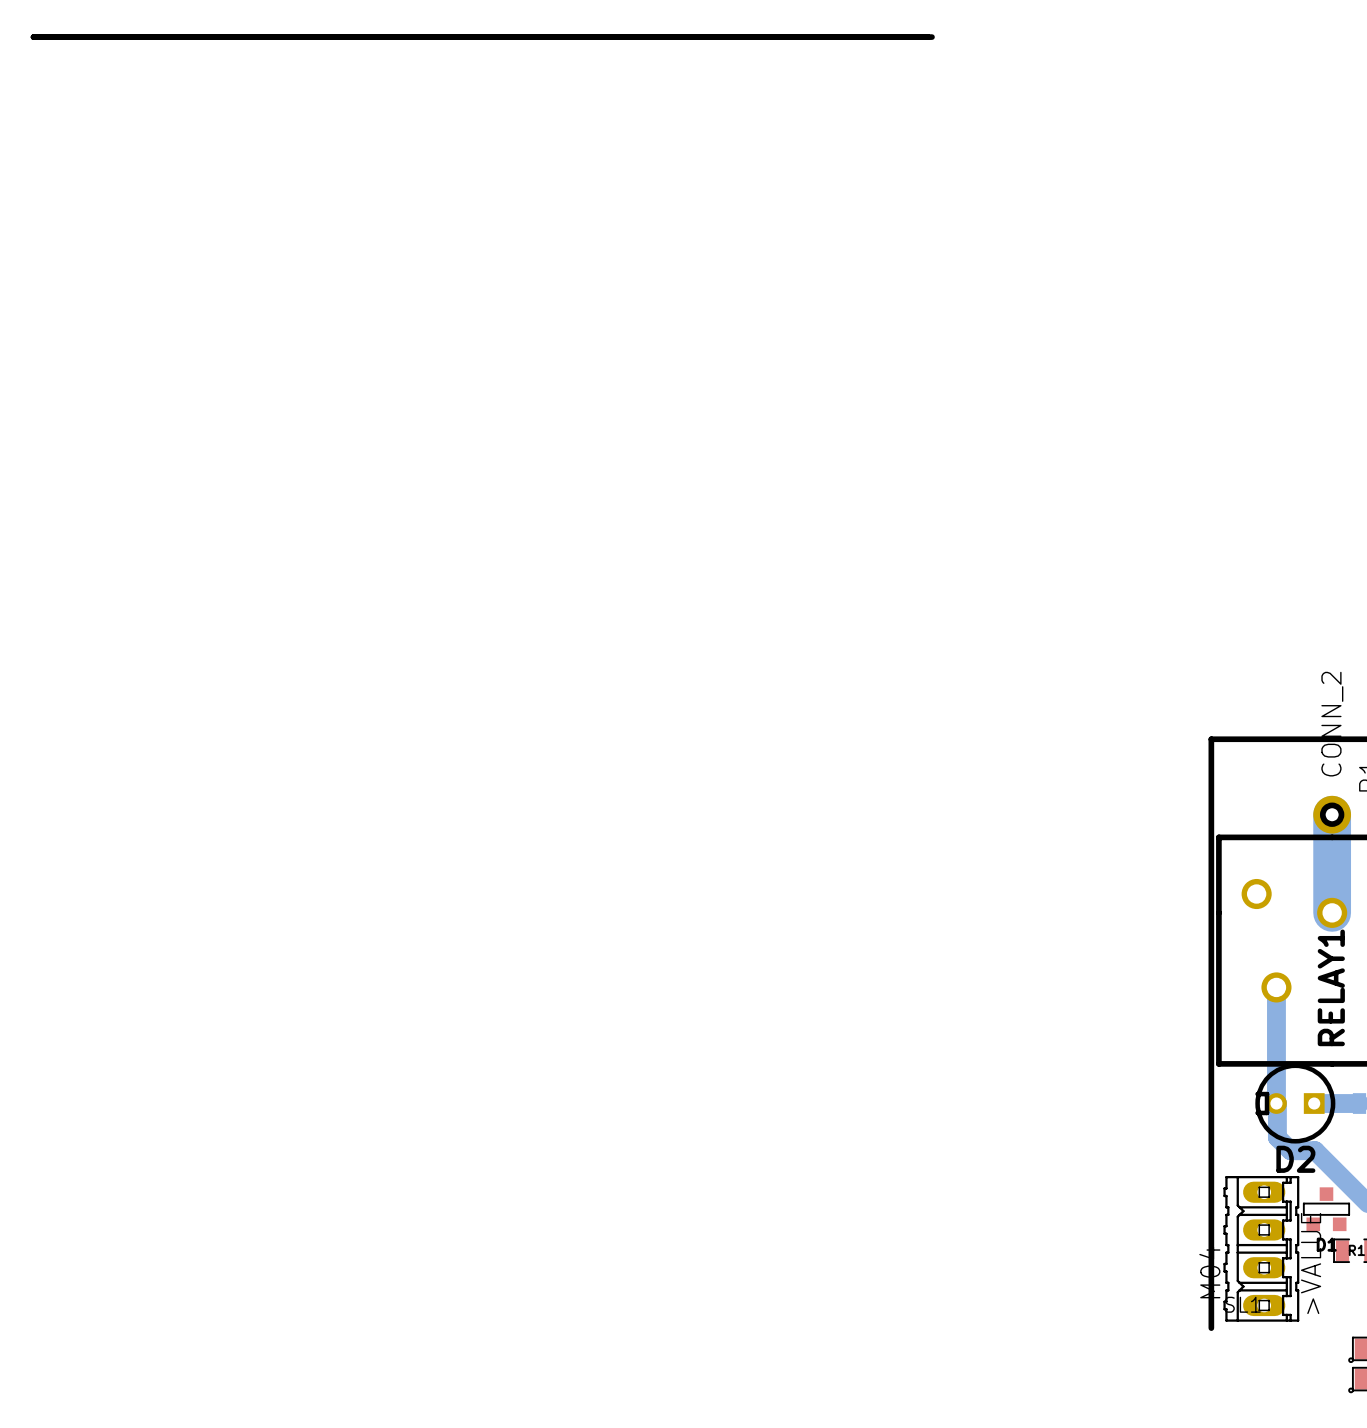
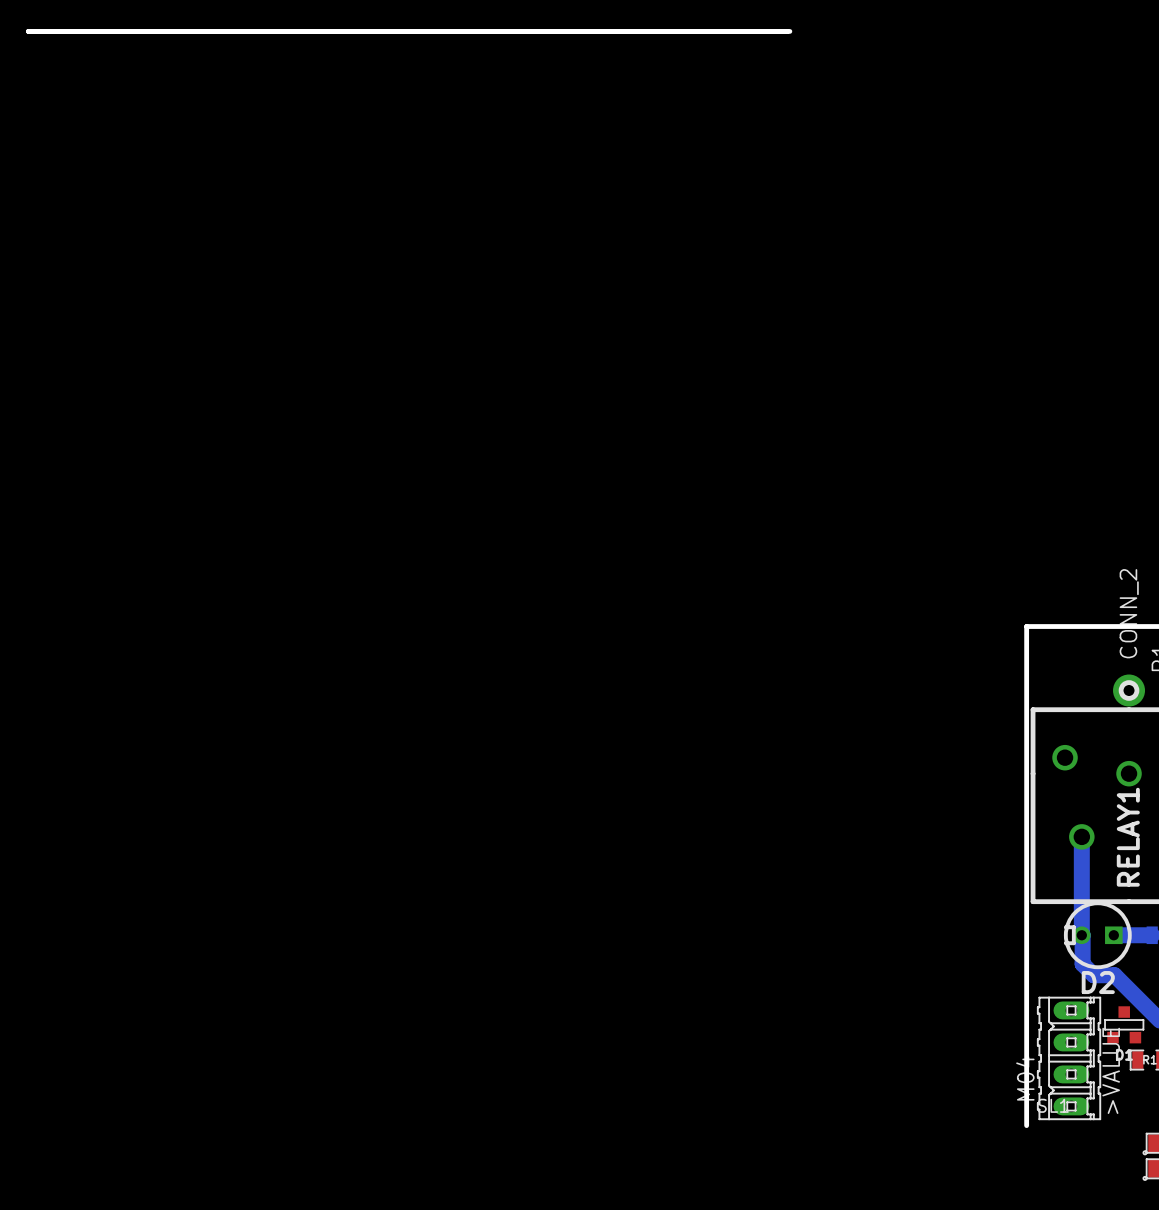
bottom track: (1332, 814) (1332, 912) -> none

